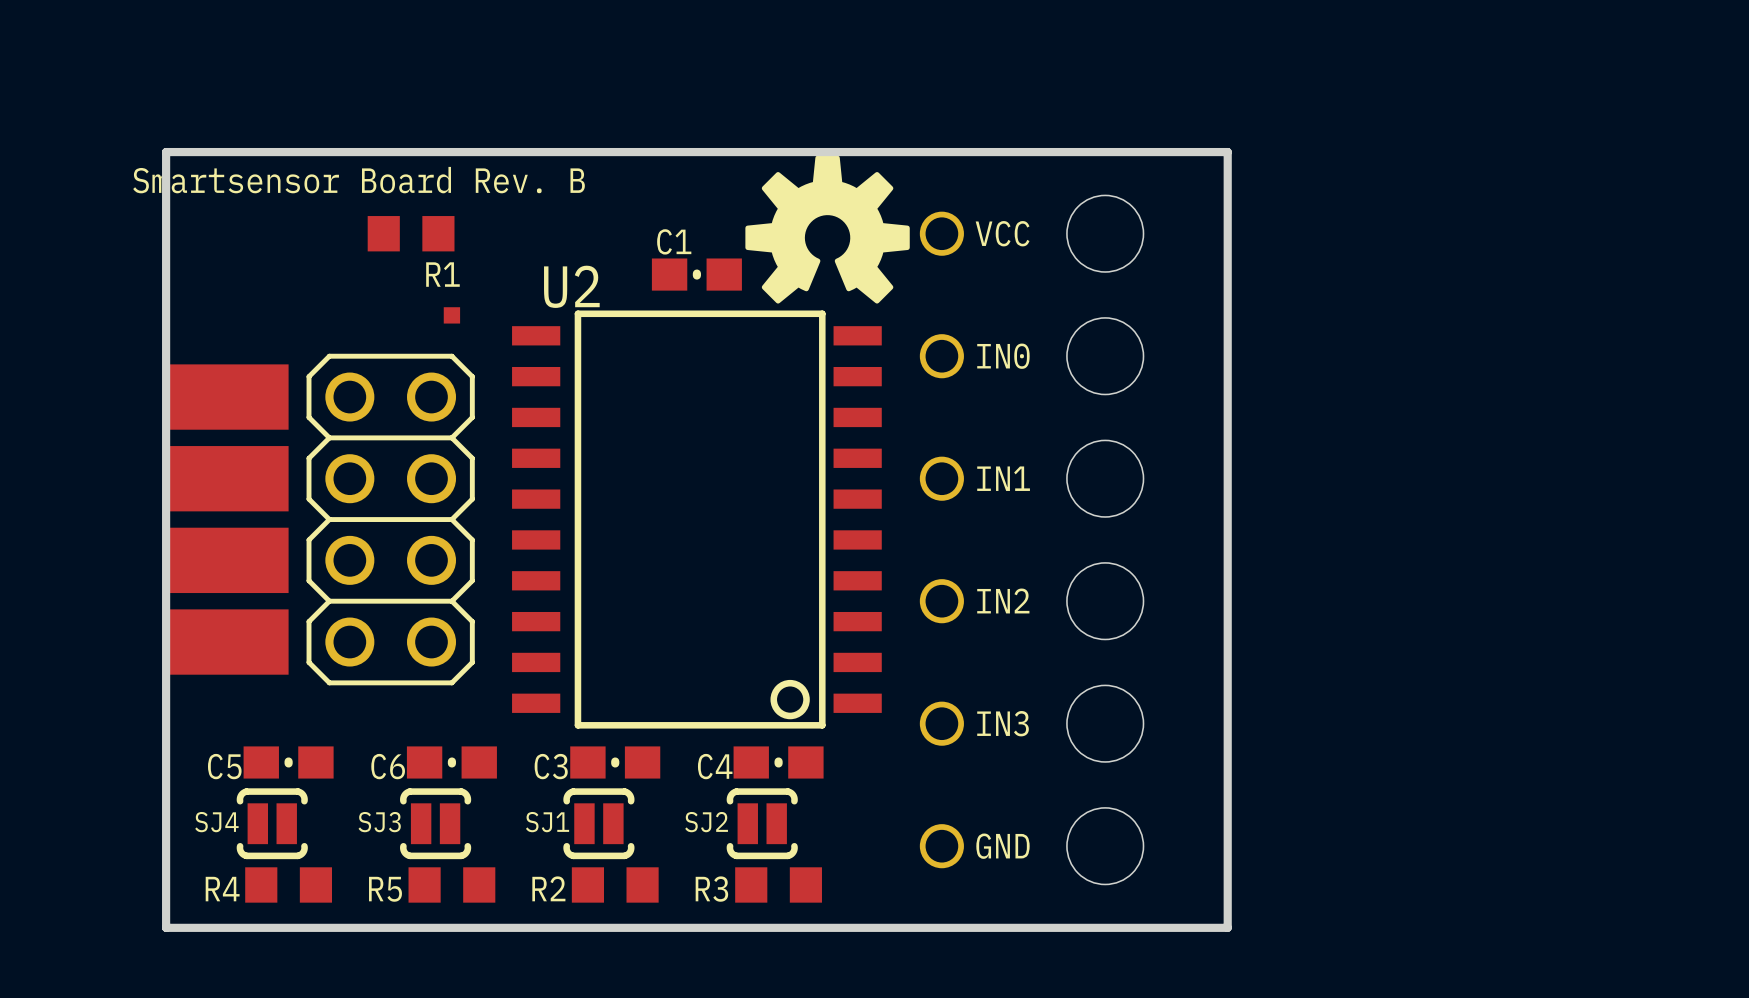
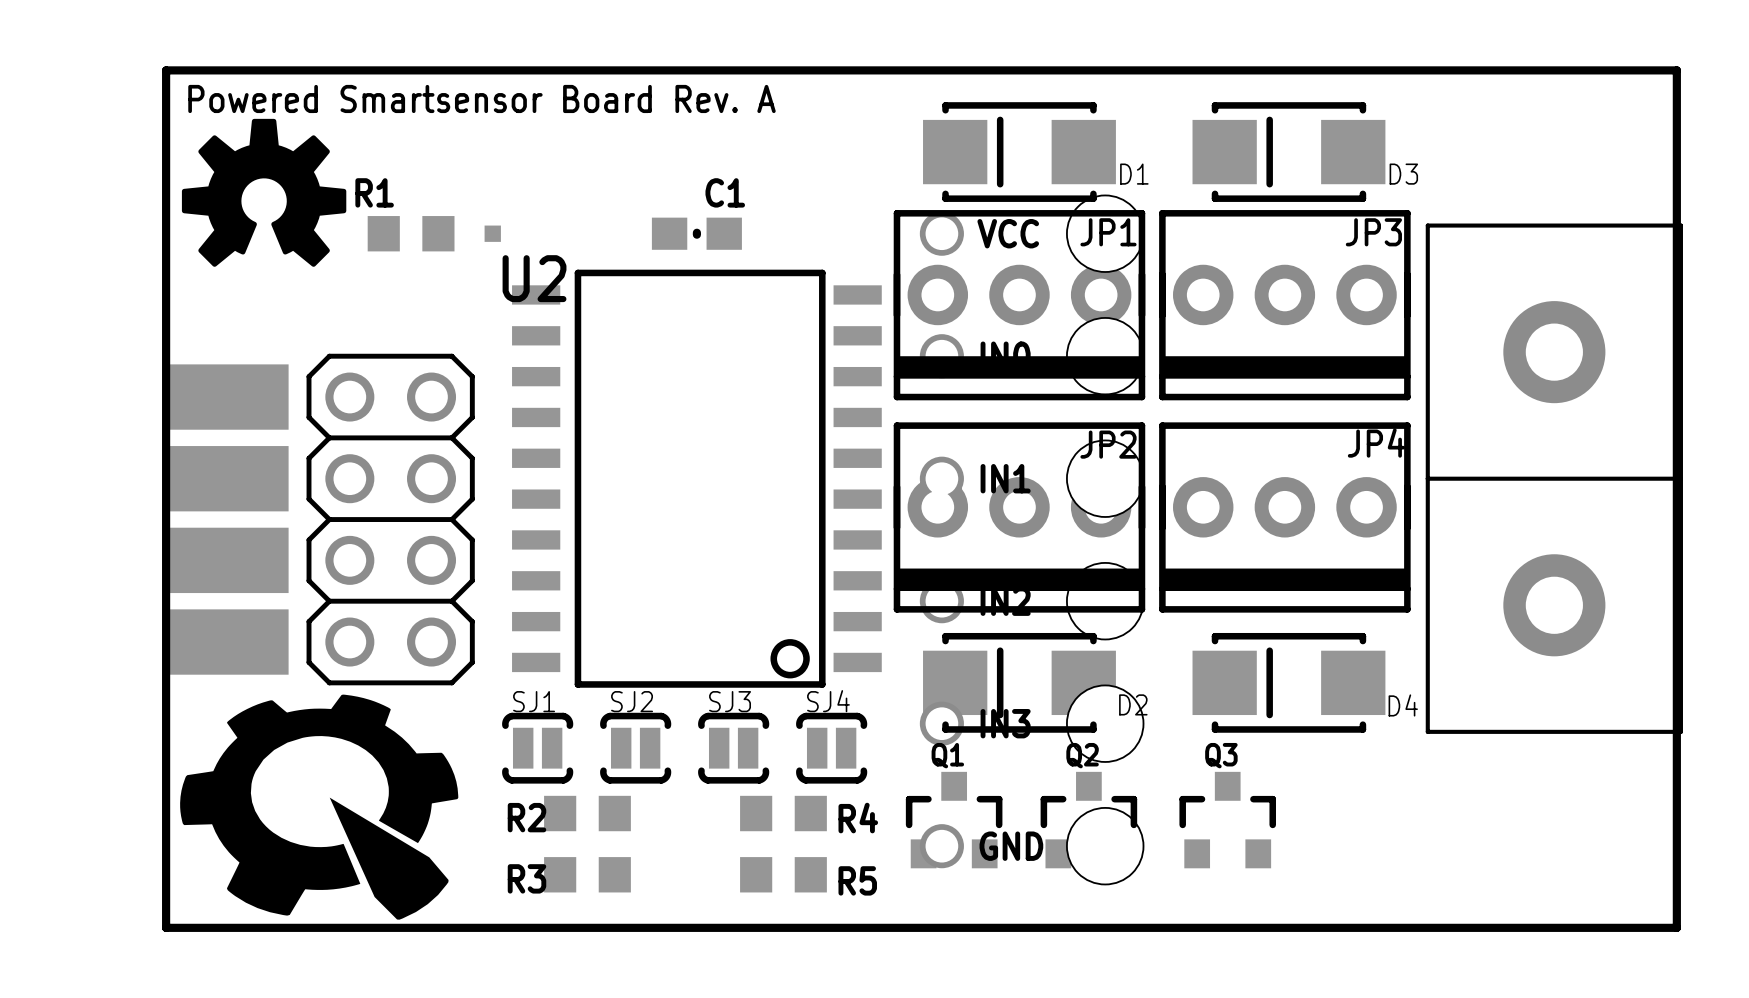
text: none -> Powered Smartsensor Board Rev. A (481, 98)
board edge: (166, 152) (1227, 152) (1227, 927) -> (166, 152) (166, 70) (1676, 70) (1676, 927) (1227, 927)
D1: none -> (1019, 152)
D3: none -> (1288, 152)
text: Smartsensor Board Rev. B (359, 180) -> none
drawing position: (827, 229) -> (264, 192)
C1 name position: C1 (674, 241) -> C1 (725, 192)
R1 name position: R1 (442, 274) -> R1 (374, 192)
C1 position: (696, 274) -> (696, 233)
U2 name position: U2 (571, 286) -> U2 (534, 278)
JP1: none -> (1019, 305)
JP3: none -> (1284, 305)
part position: (451, 315) -> (492, 233)
part: none -> (1554, 478)
JP2: none -> (1019, 517)
JP4: none -> (1284, 517)
U2 position: (696, 519) -> (696, 478)
D2: none -> (1019, 682)
D4: none -> (1288, 682)
drawing: none -> [180, 694, 459, 920]
C5: (288, 762) -> none
C6: (451, 762) -> none
C3: (615, 762) -> none
C4: (778, 762) -> none
Q1: none -> (954, 820)
Q2: none -> (1088, 820)
Q3: none -> (1227, 820)
SJ4 name position: SJ4 (216, 822) -> SJ4 (828, 701)
SJ3 name position: SJ3 (379, 822) -> SJ3 (730, 701)
SJ1 name position: SJ1 (547, 822) -> SJ1 (534, 701)
SJ2 name position: SJ2 (706, 822) -> SJ2 (632, 701)
SJ4 position: (272, 823) -> (831, 748)
SJ3 position: (435, 823) -> (733, 748)
SJ1 position: (598, 823) -> (537, 748)
SJ2 position: (762, 823) -> (635, 748)
R4 position: (288, 884) -> (783, 813)
R5 position: (451, 884) -> (783, 874)
R2 position: (615, 884) -> (587, 813)
R3 position: (778, 884) -> (587, 874)
R4 name position: R4 (222, 889) -> R4 (858, 818)
R5 name position: R5 (385, 889) -> R5 (857, 880)

